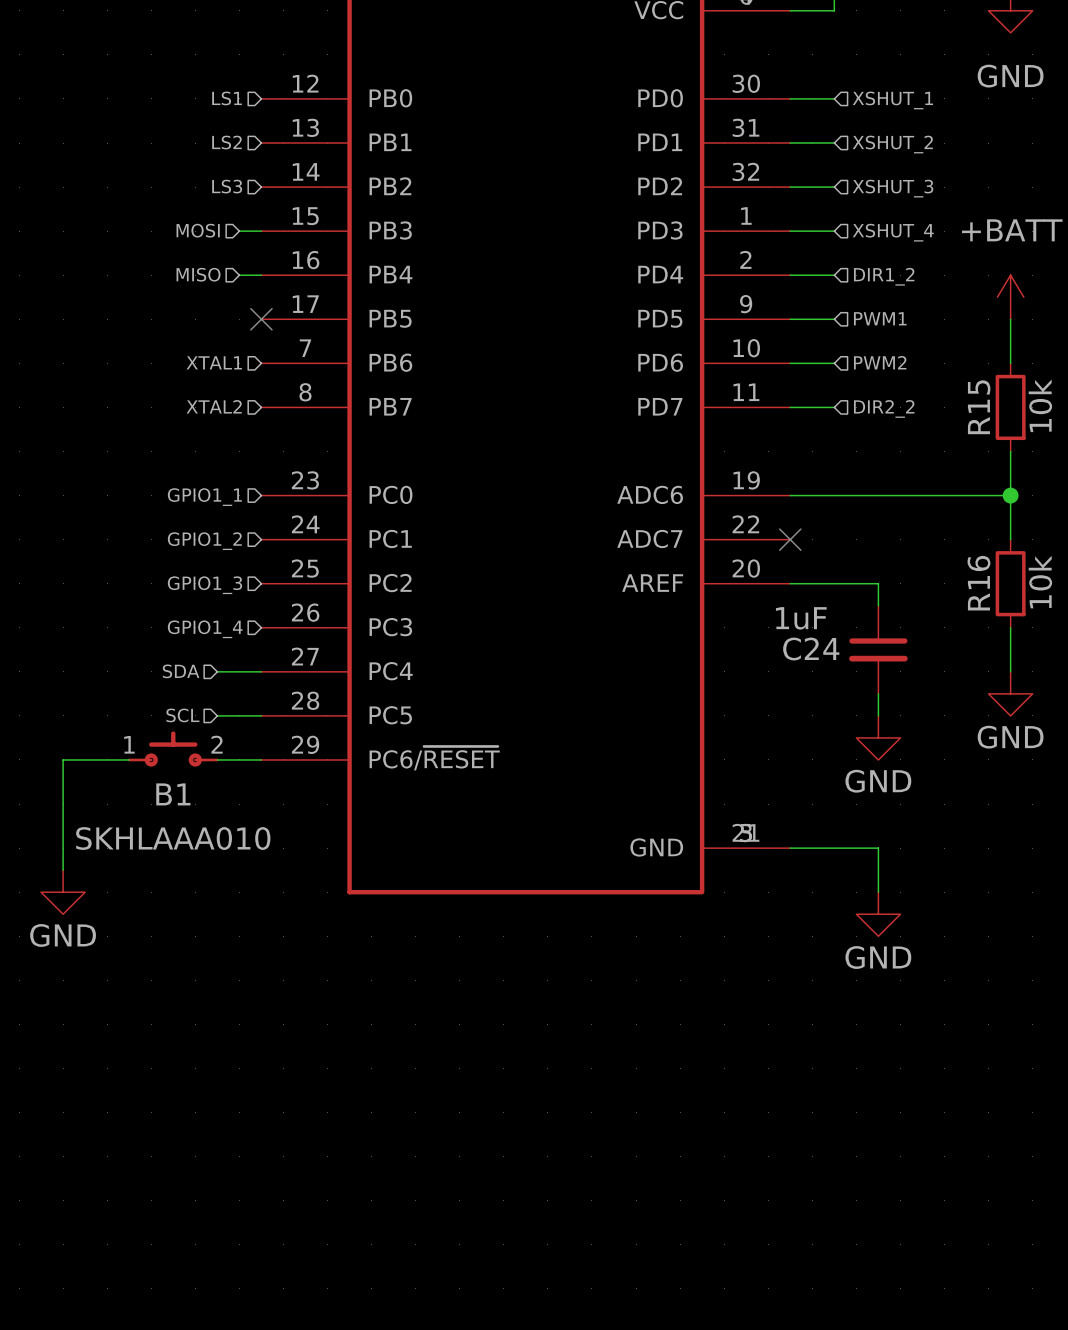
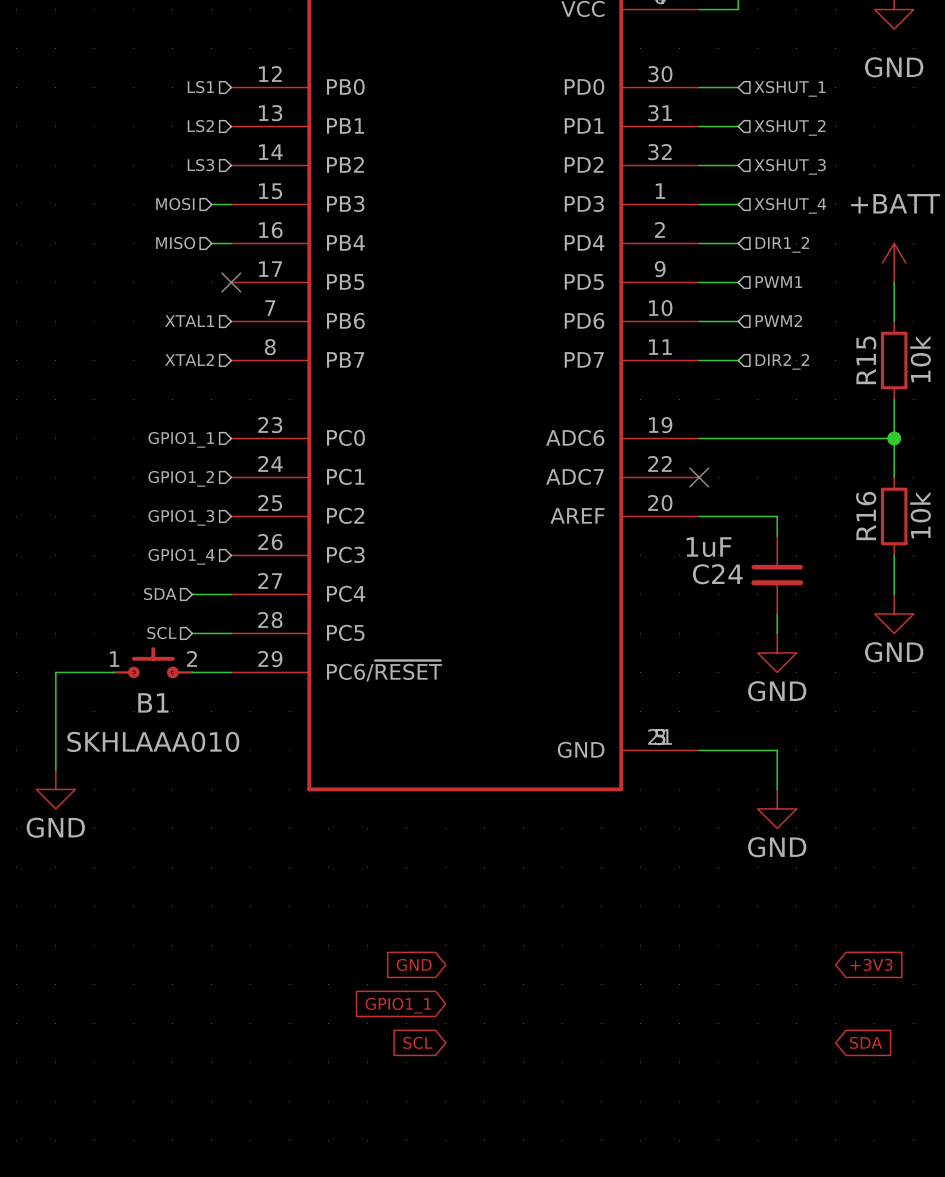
global label: none -> GND (414, 964)
global label: none -> +3V3 (871, 964)
global label: none -> GPIO1_1 (398, 1005)
global label: none -> SCL (417, 1042)
global label: none -> SDA (866, 1042)

